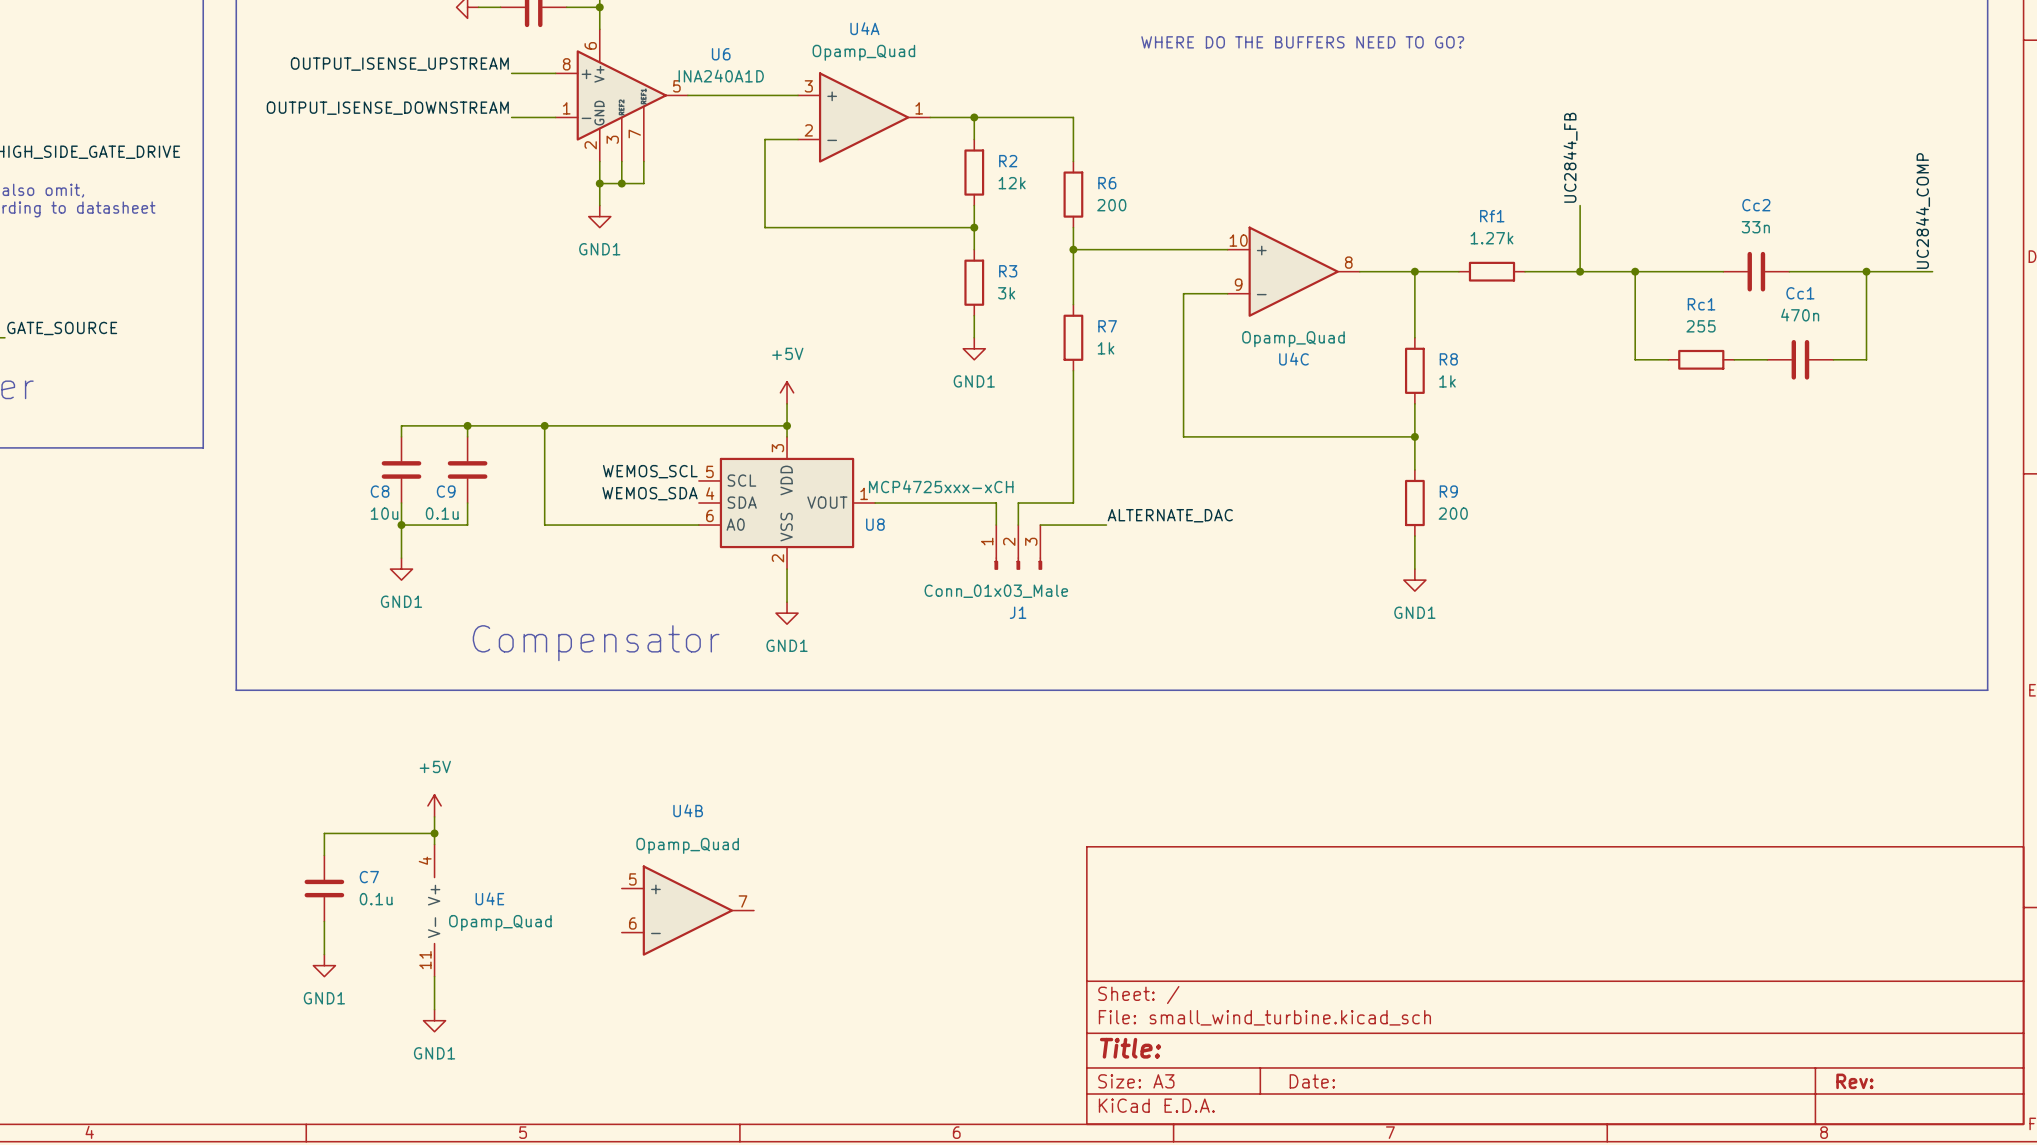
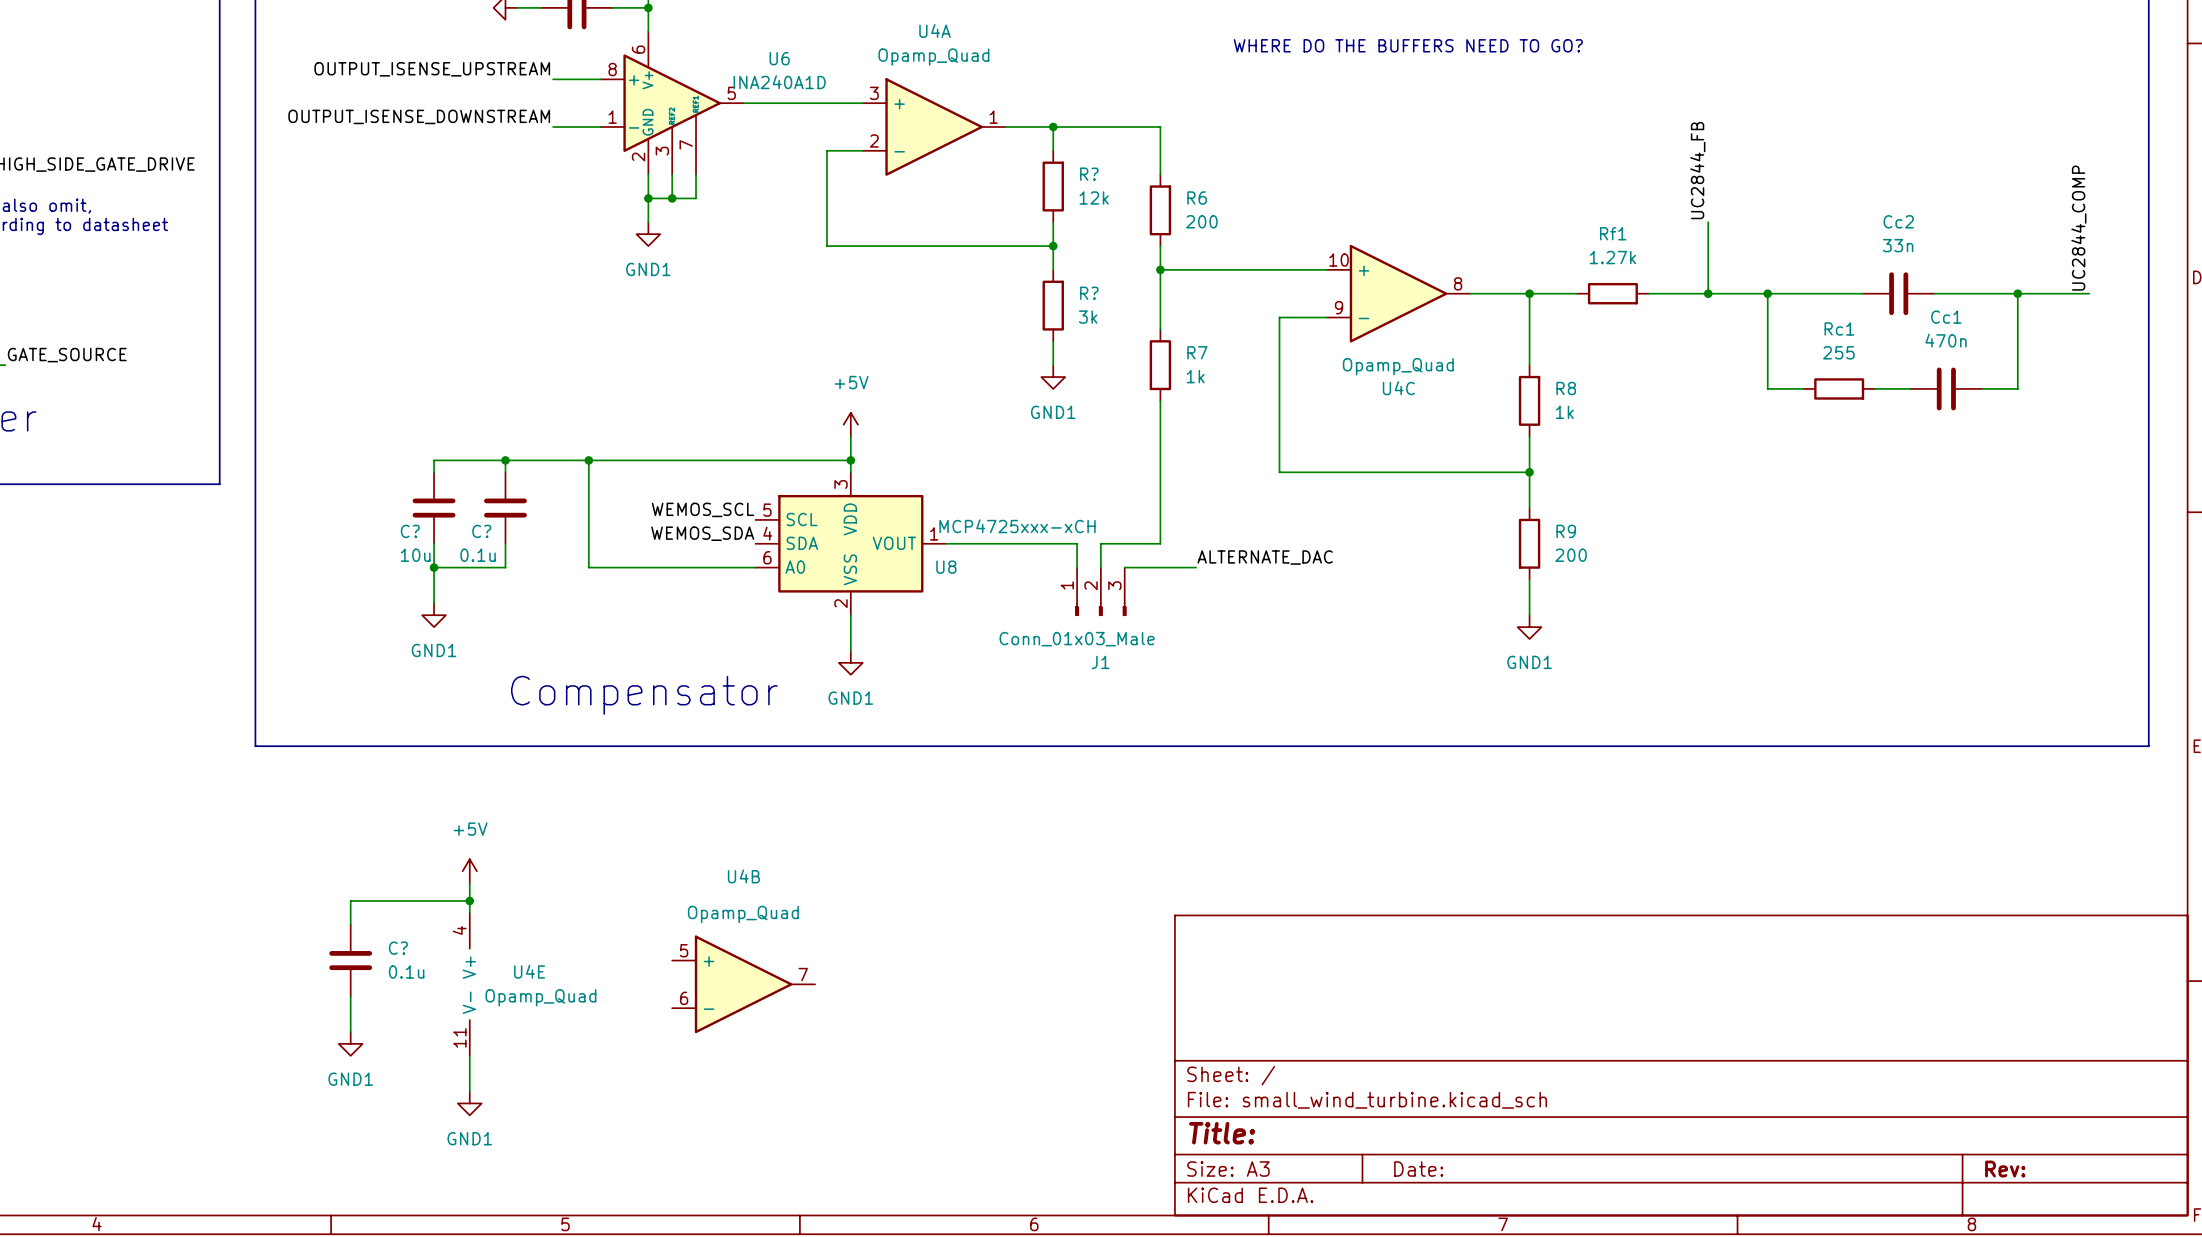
R2 name: R2 (1008, 161) -> R? (1089, 174)
R3 name: R3 (1008, 271) -> R? (1089, 293)
C8 name: C8 (380, 491) -> C? (410, 531)
C9 name: C9 (446, 491) -> C? (481, 531)
C7 name: C7 (369, 877) -> C? (398, 948)

